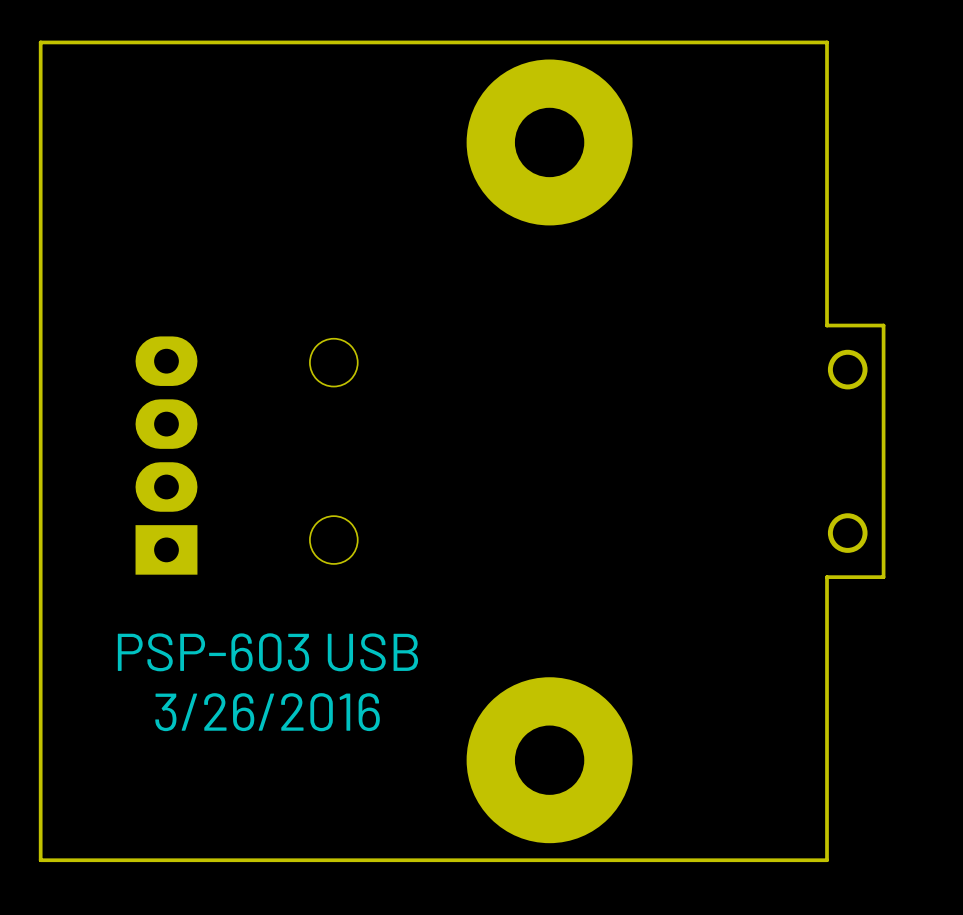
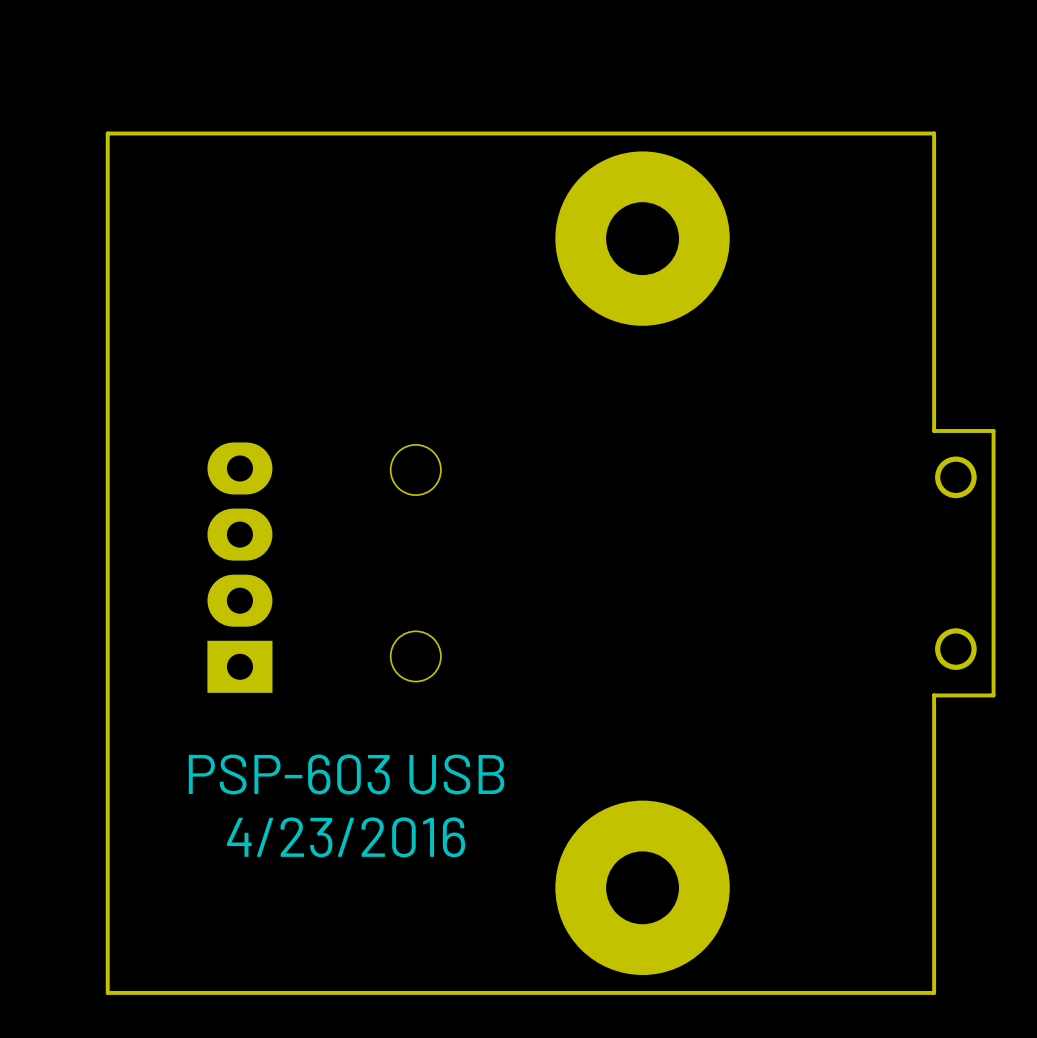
text: 3/26/2016 (267, 712) -> 4/23/2016 (346, 837)

